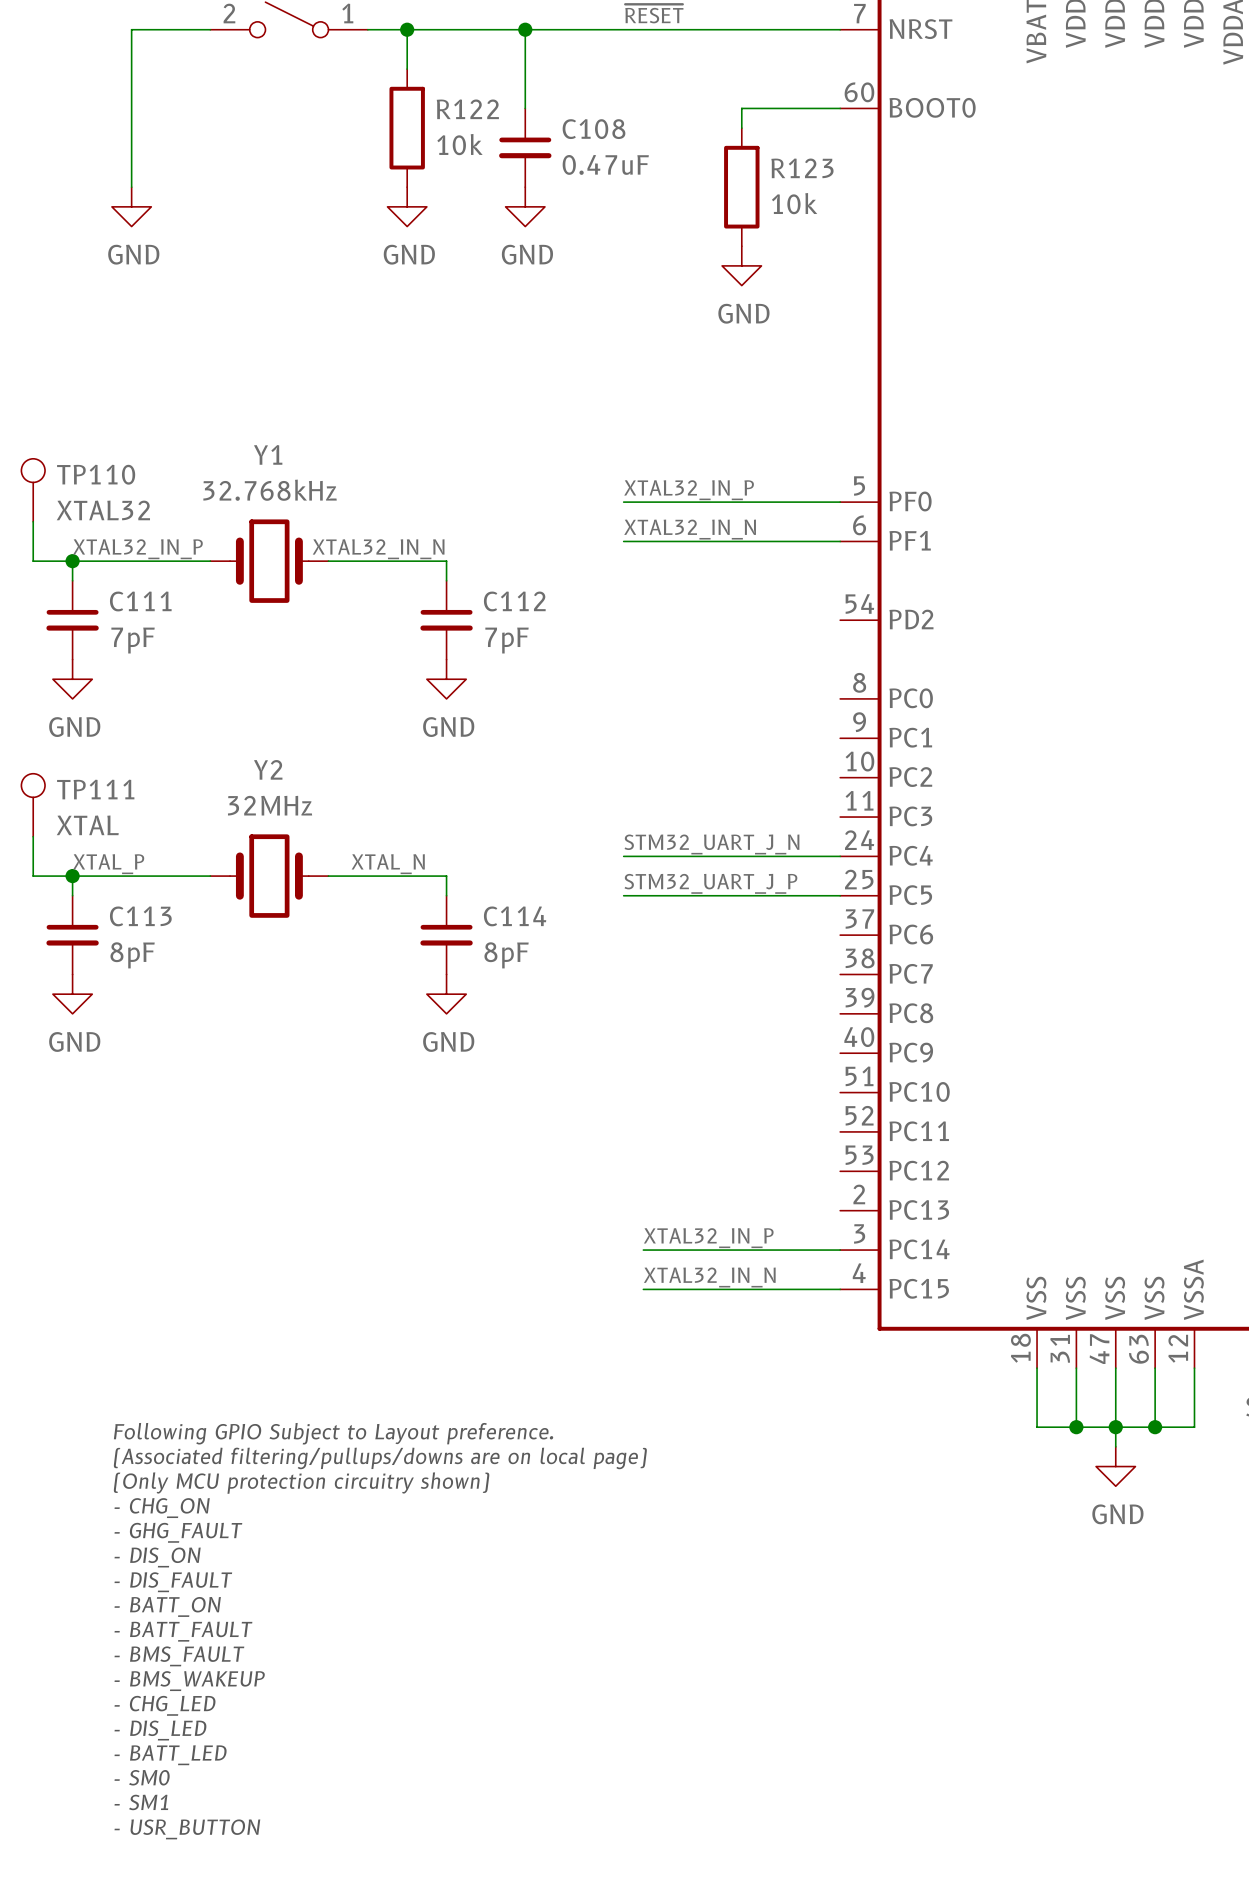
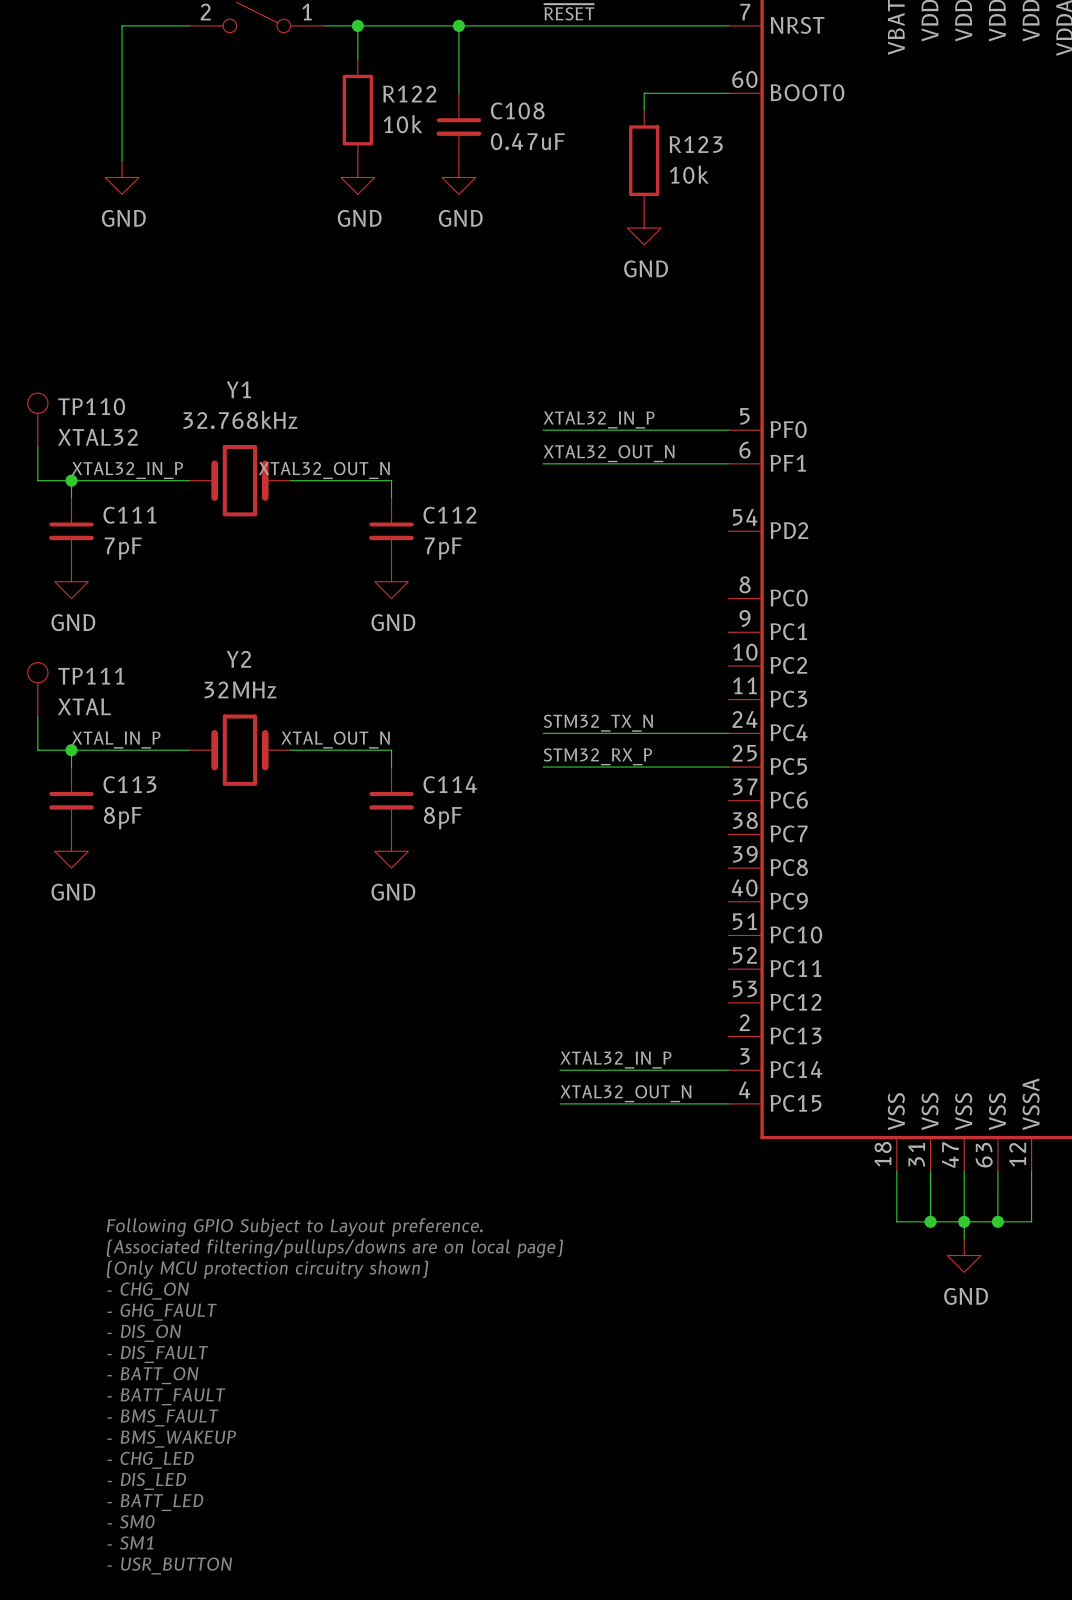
label: XTAL32_IN_N (690, 529) -> XTAL32_OUT_N (609, 453)
label: XTAL32_IN_N (378, 549) -> XTAL32_OUT_N (324, 470)
label: STM32_UART_J_N (711, 844) -> STM32_TX_N (598, 723)
label: XTAL_P (108, 864) -> XTAL_IN_P (116, 739)
label: XTAL_N (388, 864) -> XTAL_OUT_N (335, 739)
label: STM32_UART_J_P (710, 883) -> STM32_RX_P (597, 756)
label: XTAL32_IN_N (709, 1277) -> XTAL32_OUT_N (625, 1093)

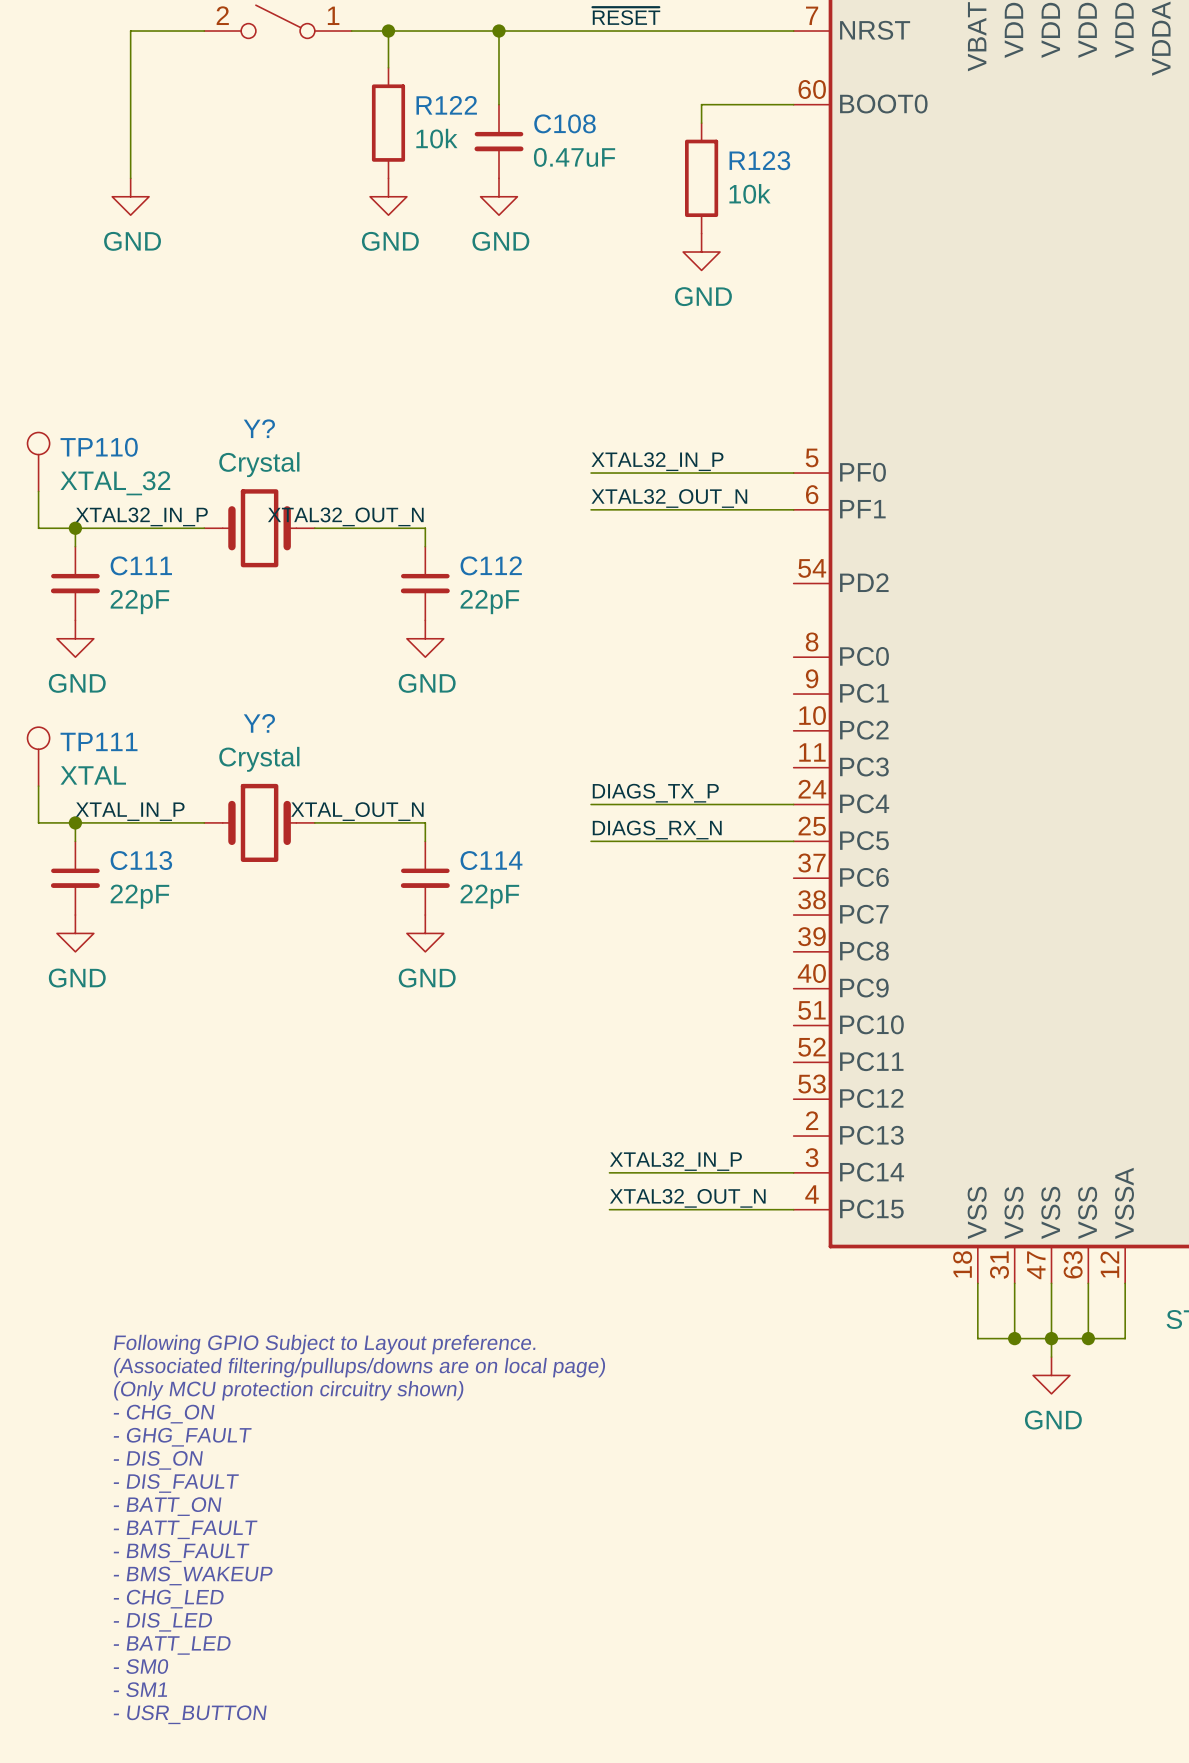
Y1 name: Y1 (238, 389) -> Y? (259, 428)
Y1 value: 32.768kHz (240, 419) -> Crystal (259, 464)
TP110 value: XTAL32 (97, 437) -> XTAL_32 (115, 483)
C111 value: 7pF (123, 548) -> 22pF (139, 602)
C112 value: 7pF (443, 548) -> 22pF (489, 602)
Y2 name: Y2 (238, 659) -> Y? (259, 723)
Y2 value: 32MHz (240, 689) -> Crystal (259, 759)
label: STM32_TX_N (598, 723) -> DIAGS_TX_P (655, 793)
label: STM32_RX_P (597, 756) -> DIAGS_RX_N (657, 830)
C113 value: 8pF (122, 818) -> 22pF (139, 896)
C114 value: 8pF (442, 818) -> 22pF (489, 896)

